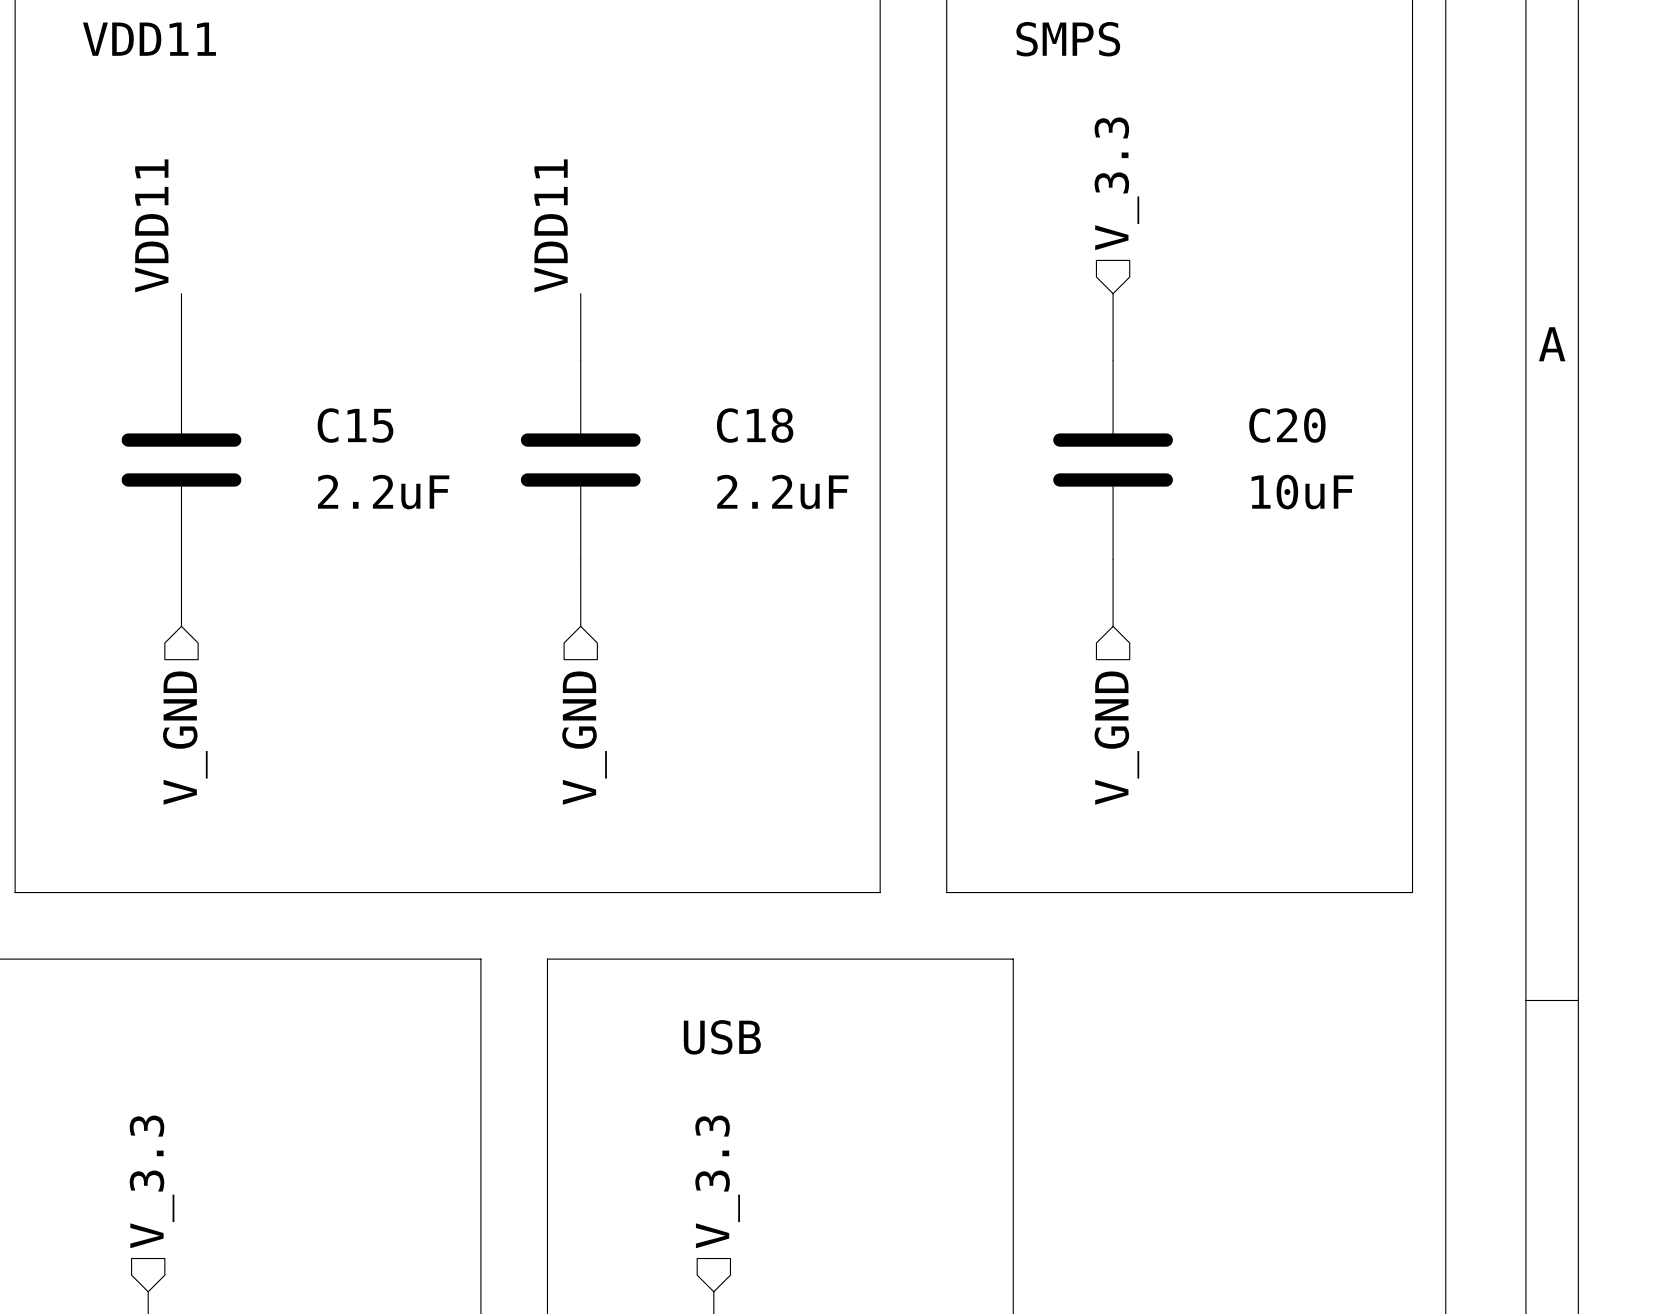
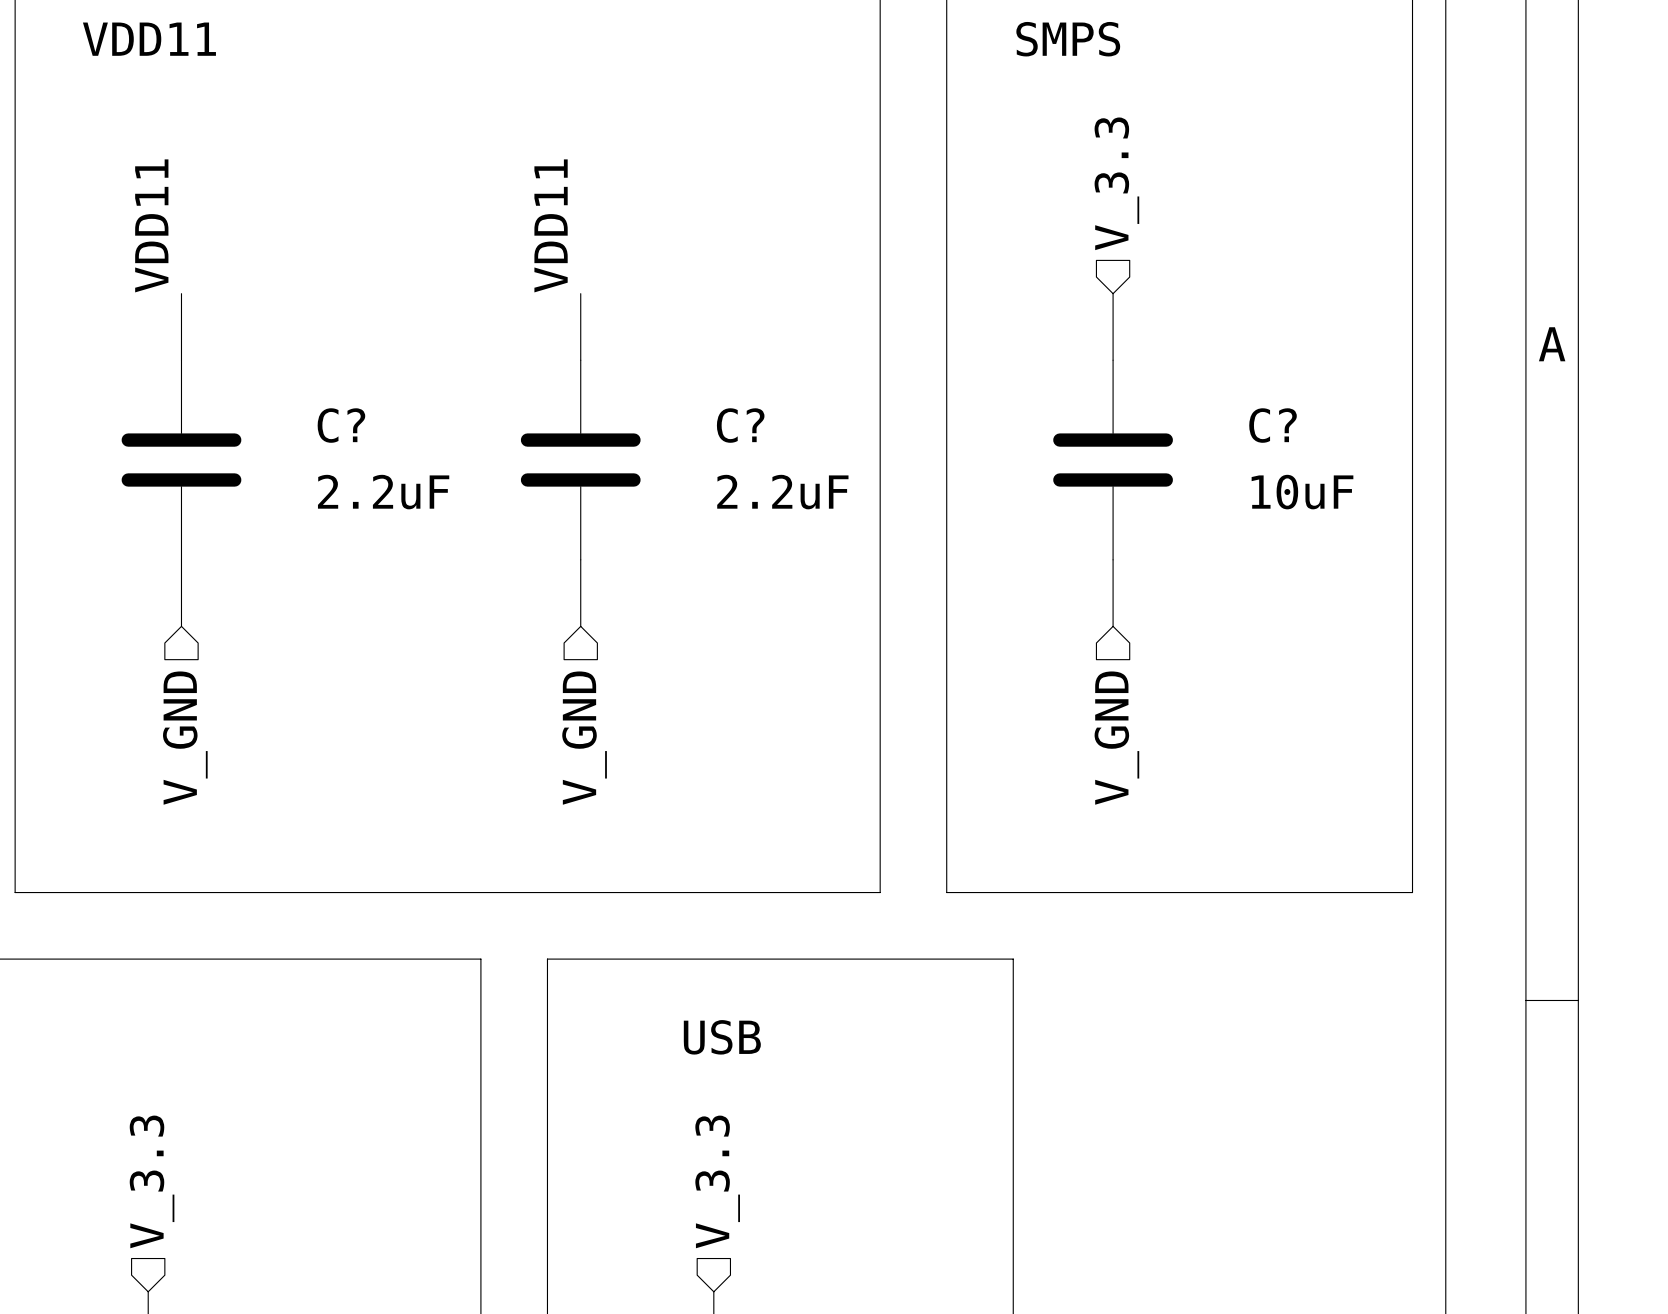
C15 name: C15 (355, 425) -> C? (341, 425)
C18 name: C18 (755, 425) -> C? (740, 425)
C20 name: C20 (1287, 425) -> C? (1273, 425)

